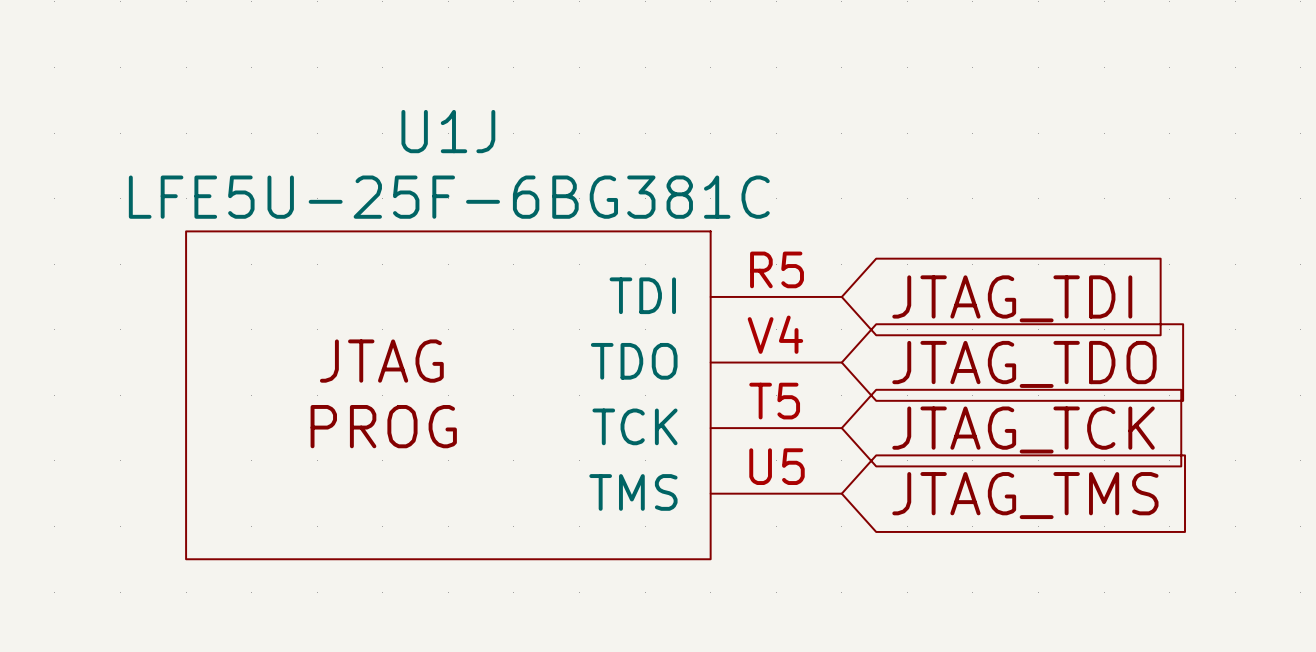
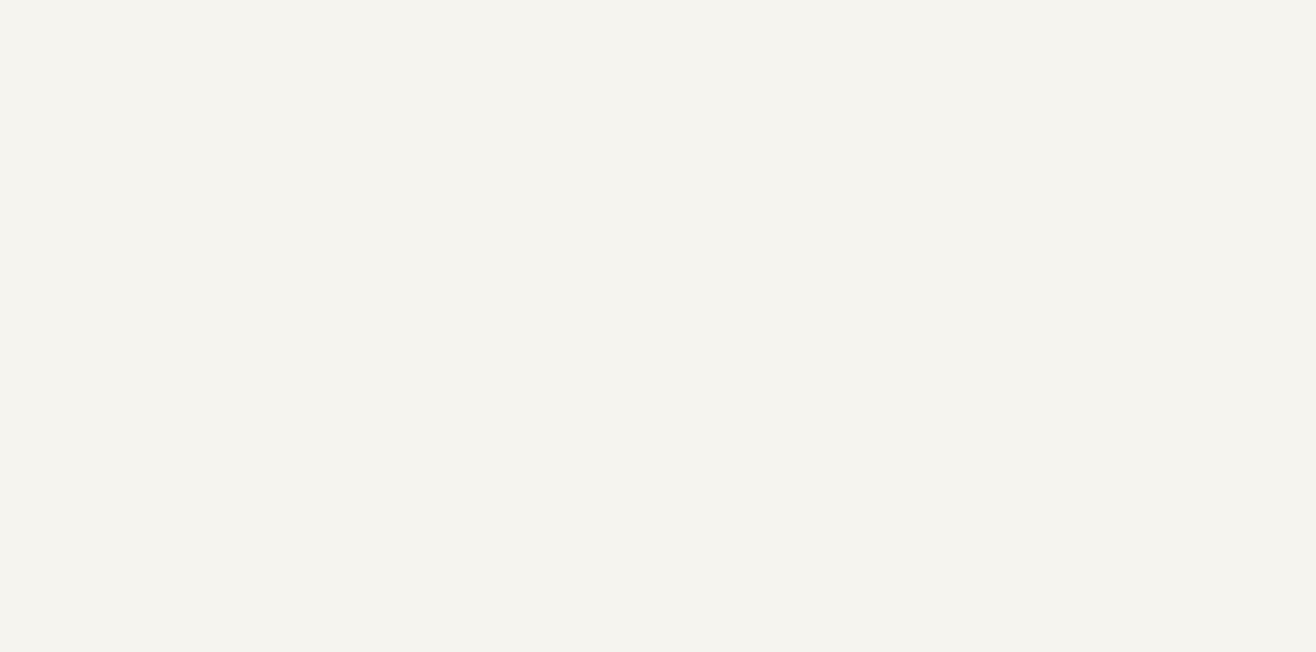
global label: JTAG_TDI (1012, 298) -> none
global label: JTAG_TDO (1024, 364) -> none
U1J: LFE5U-25F-6BG381C (513, 395) -> none
global label: JTAG_TCK (1023, 429) -> none
global label: JTAG_TMS (1025, 495) -> none

